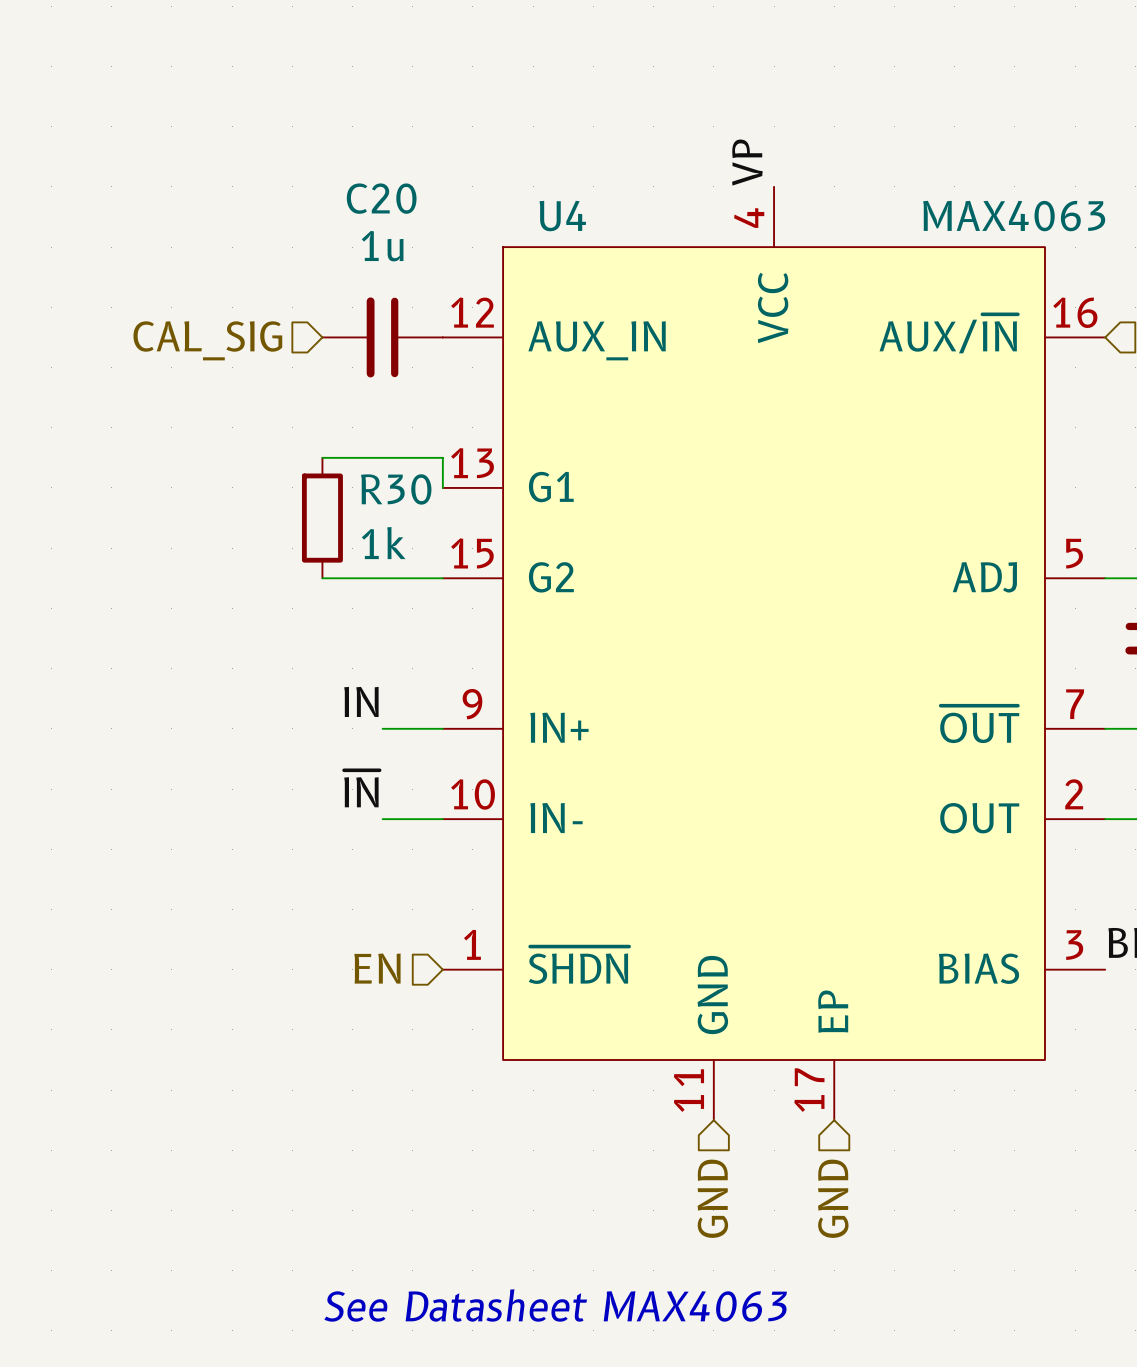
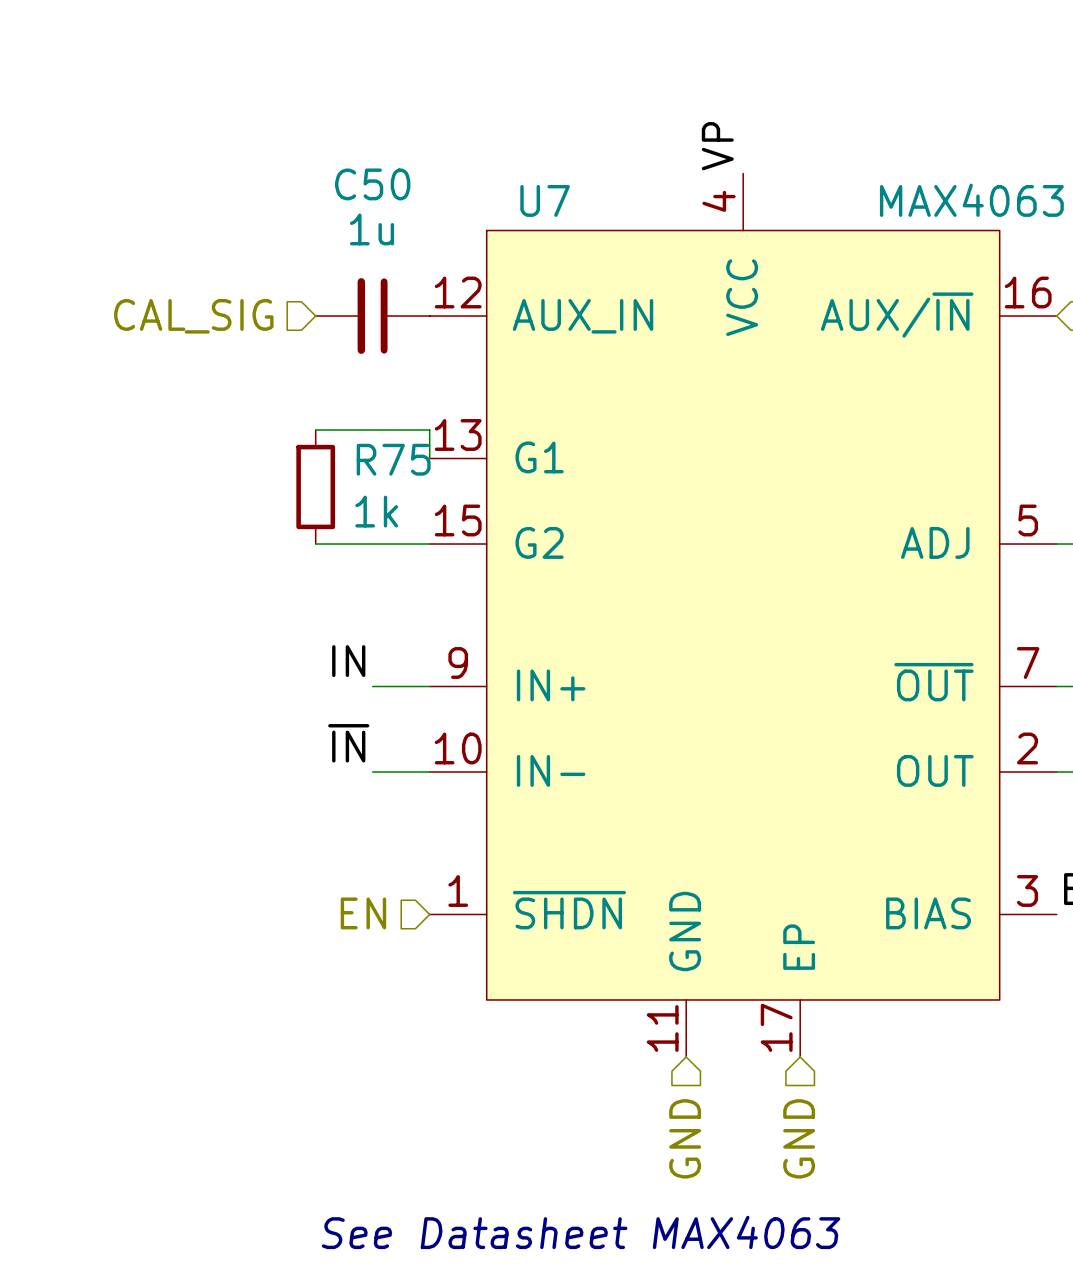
C20 name: C20 (381, 198) -> C50 (372, 184)
U4 name: U4 (562, 216) -> U7 (545, 200)
R30 name: R30 (396, 489) -> R75 (393, 459)

